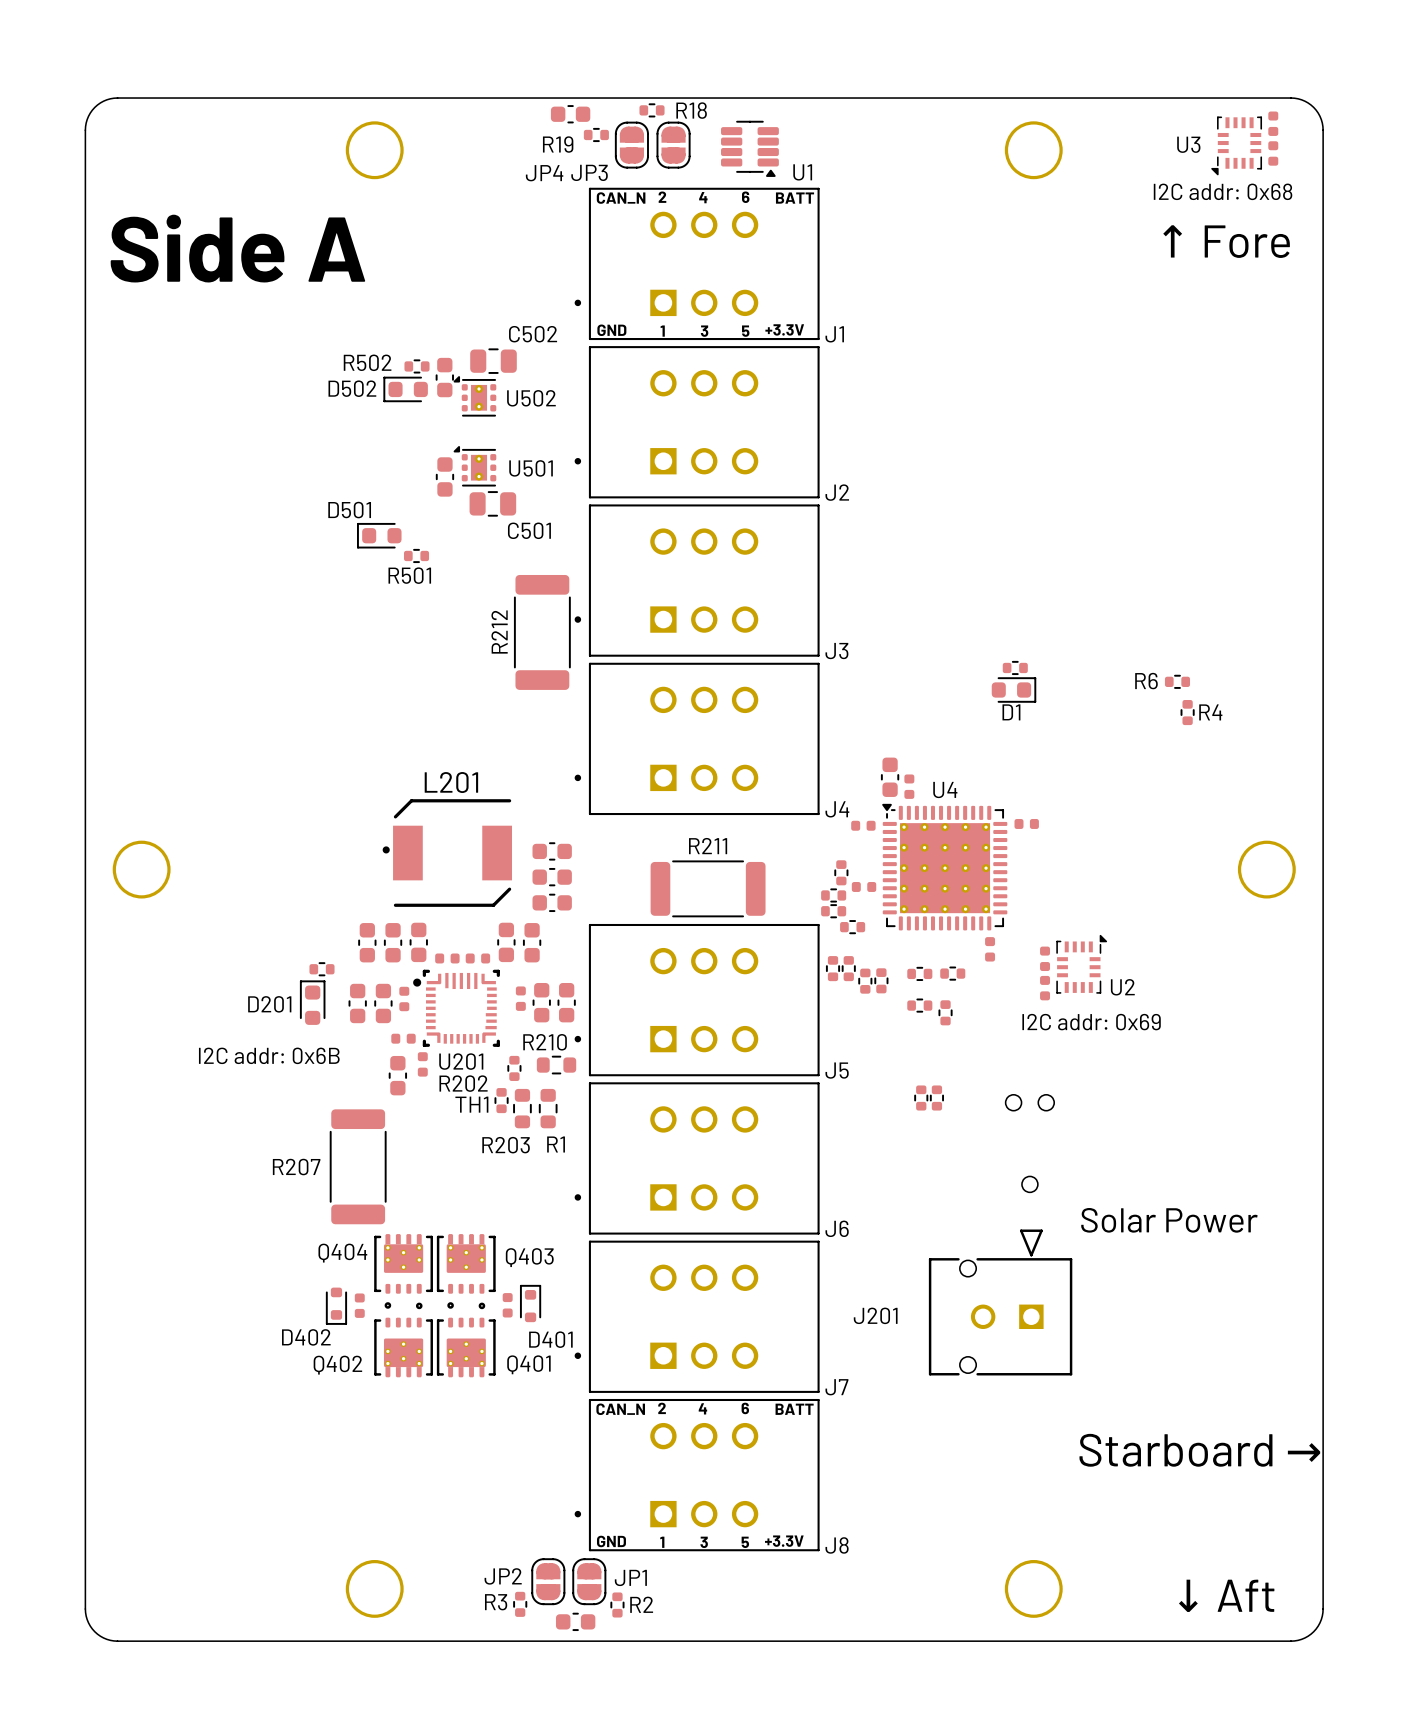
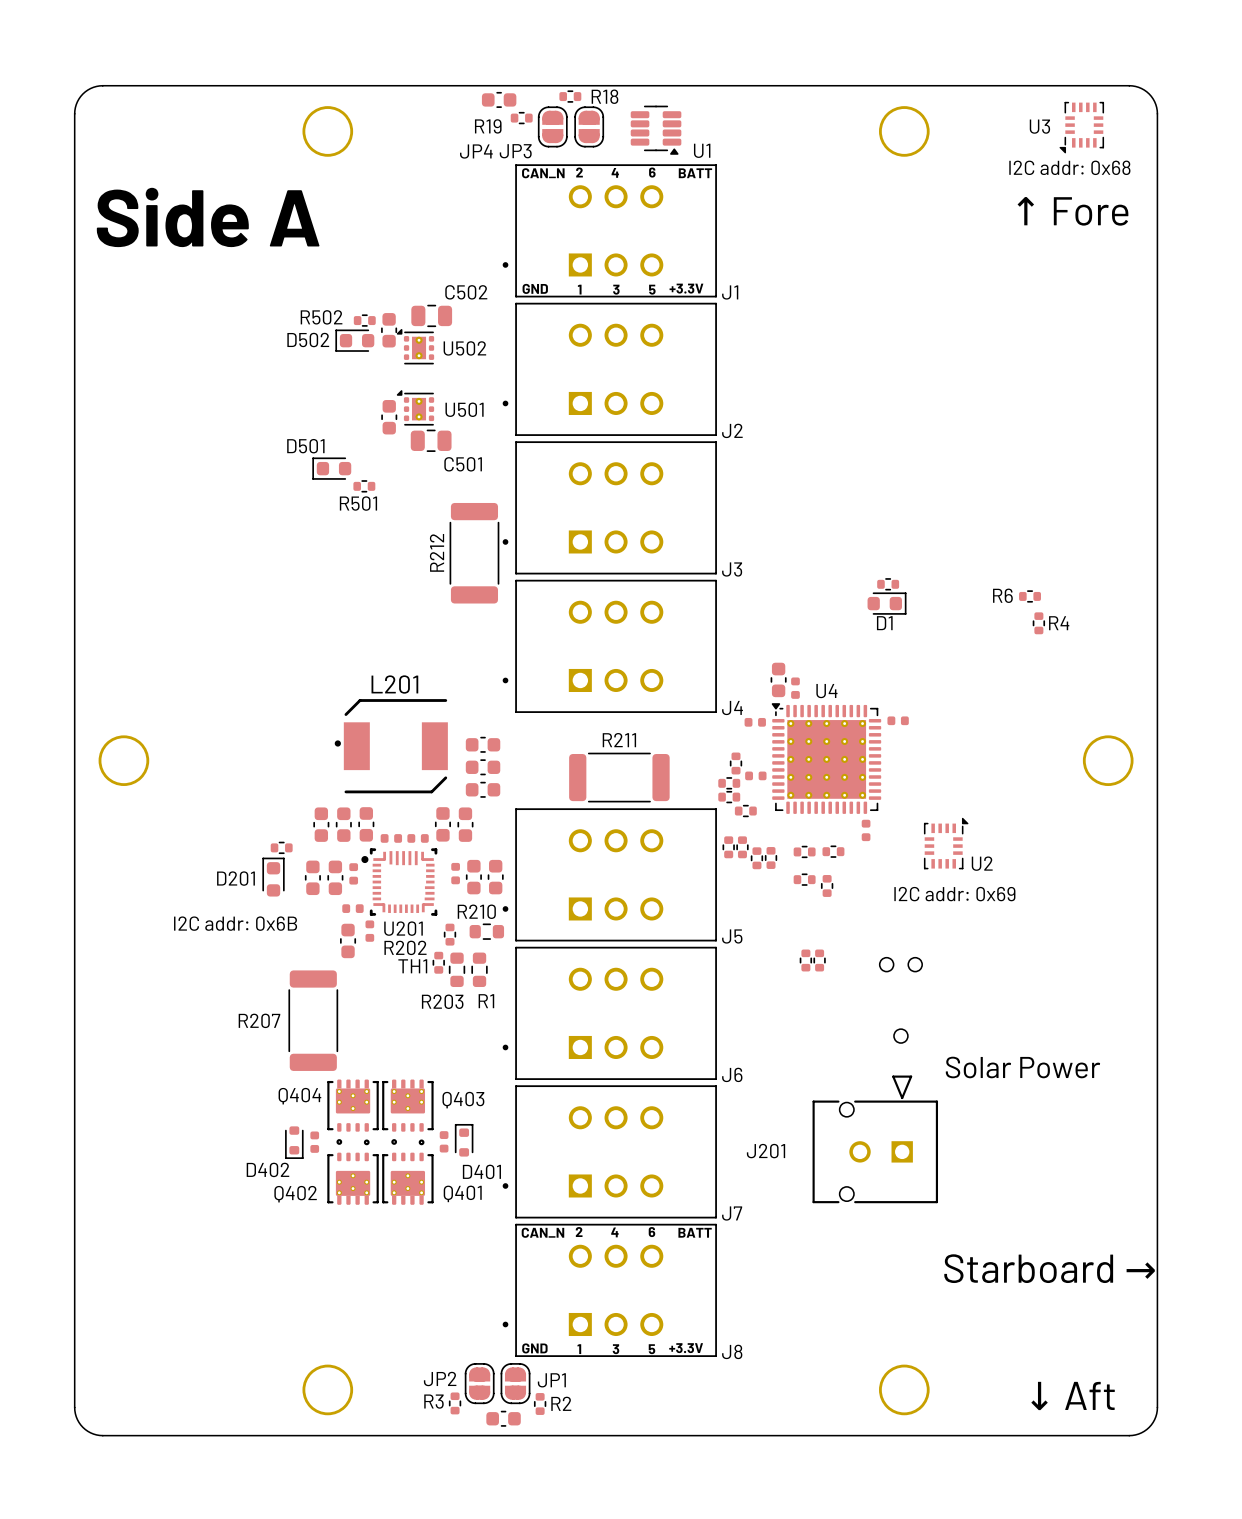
part: (1273, 123) -> none
part: (1273, 153) -> none
part: (1045, 958) -> none
part: (1045, 988) -> none

